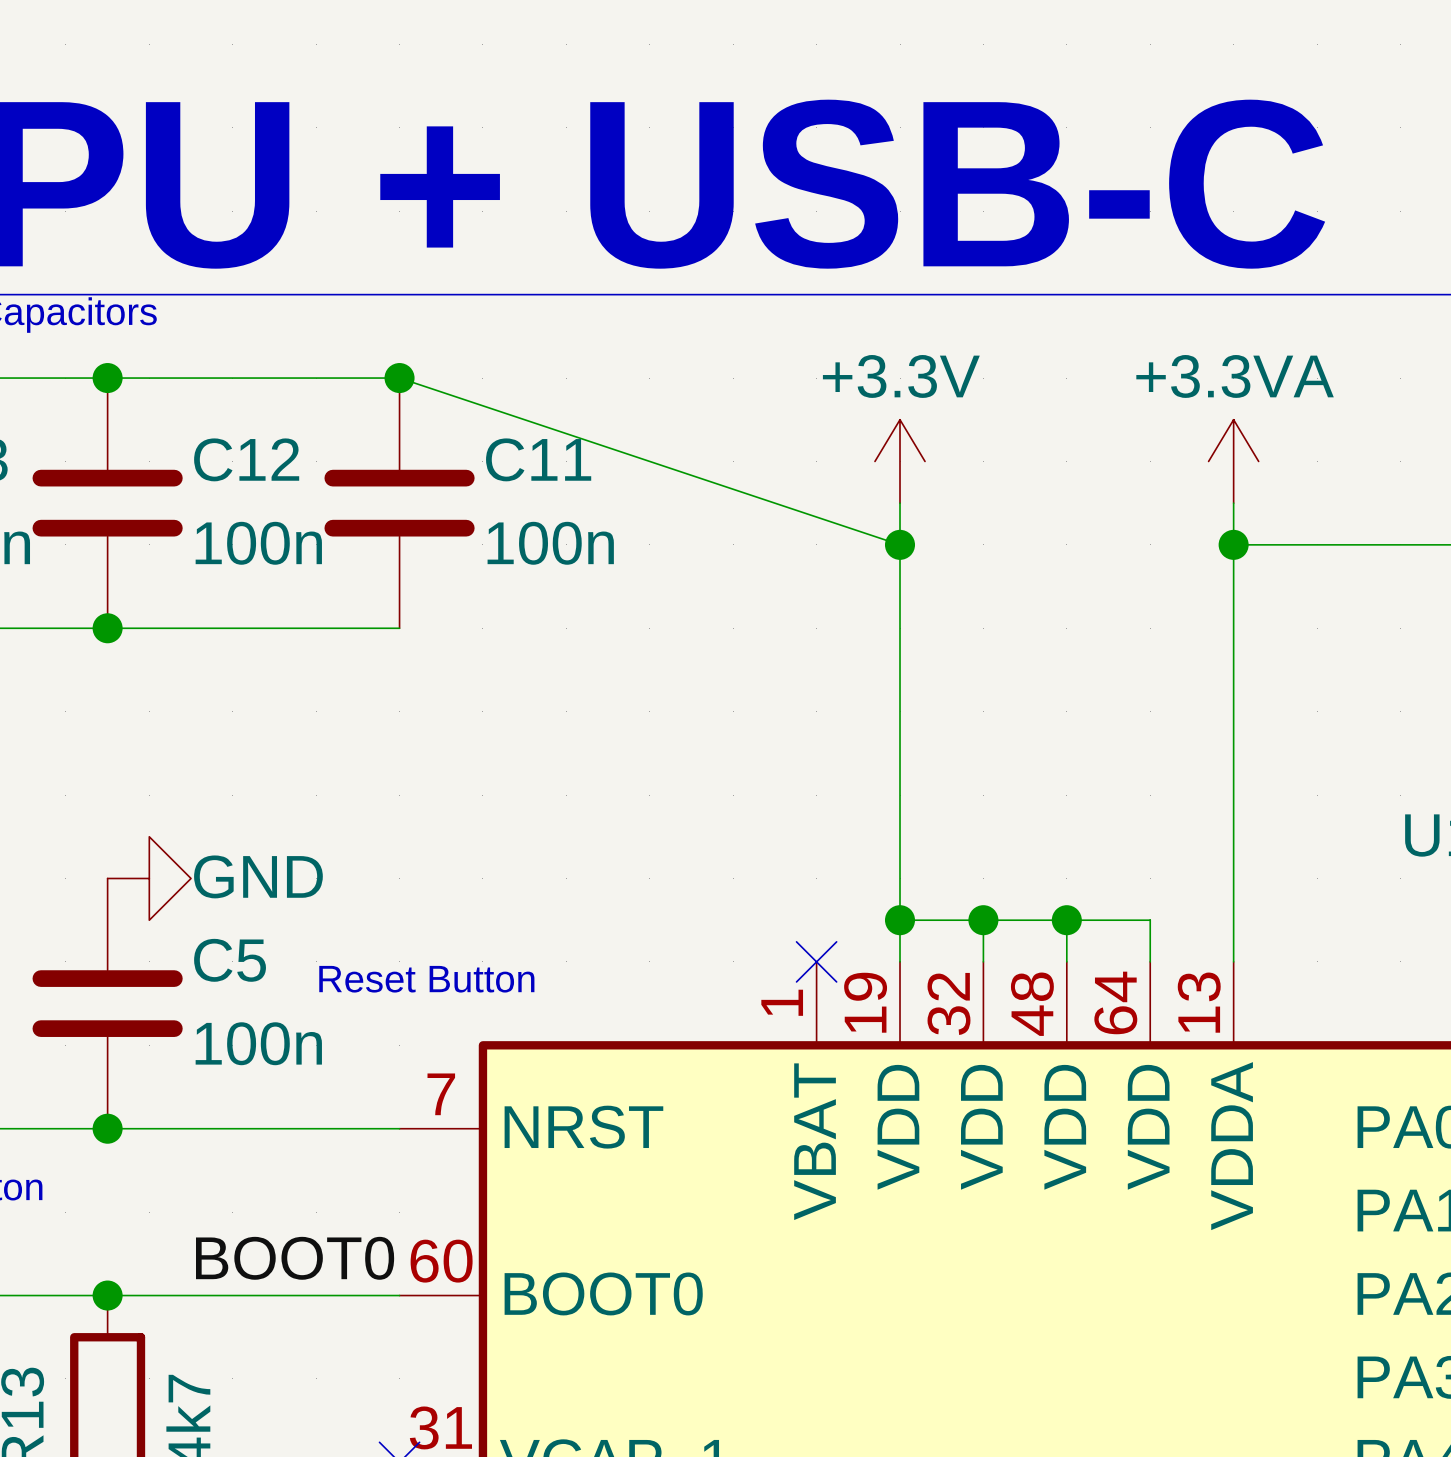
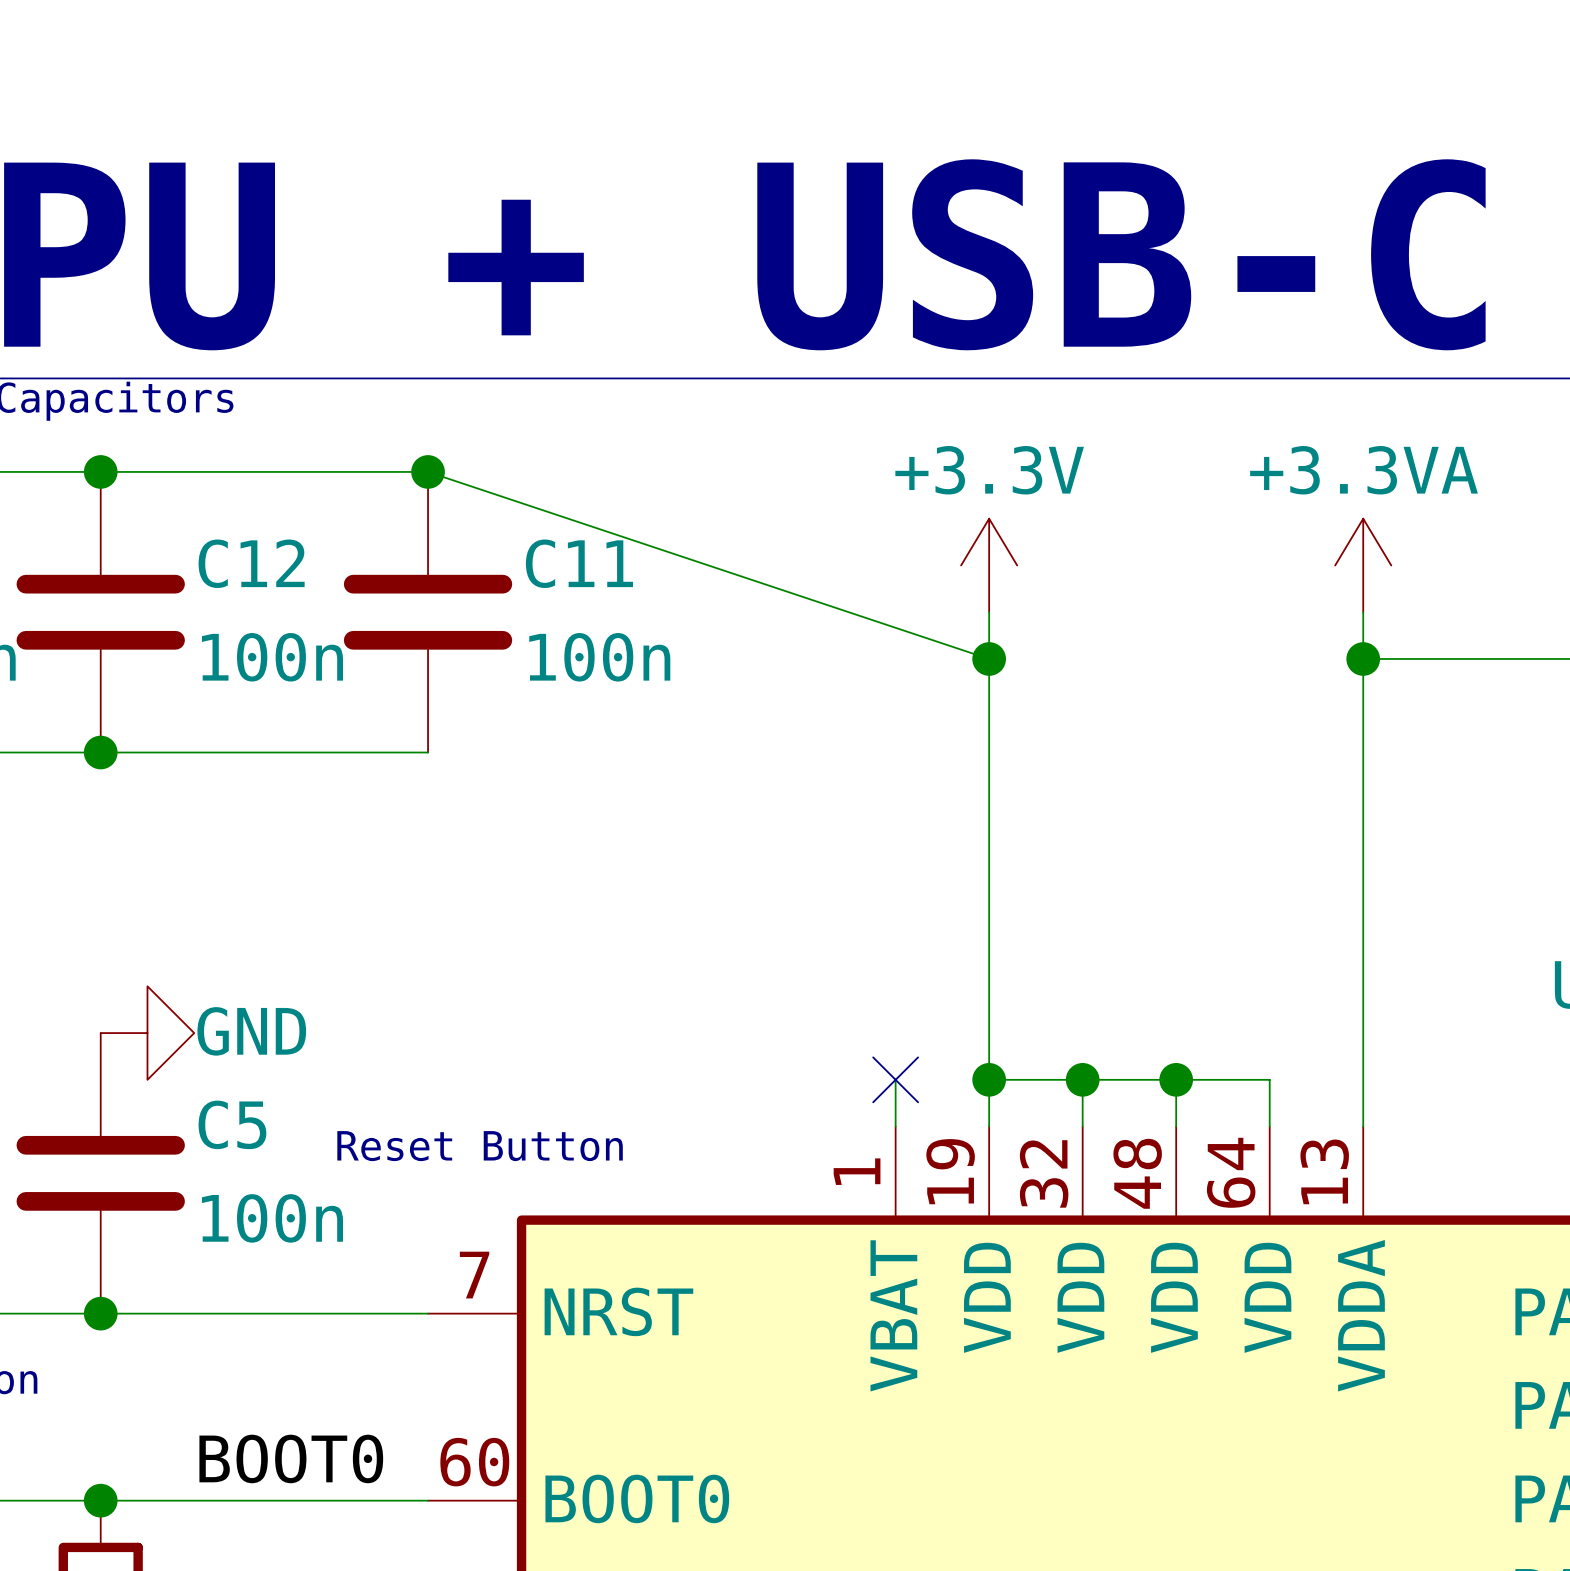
wire: none -> (895, 1079) (895, 1126)
no-connect mark position: (816, 961) -> (895, 1079)

